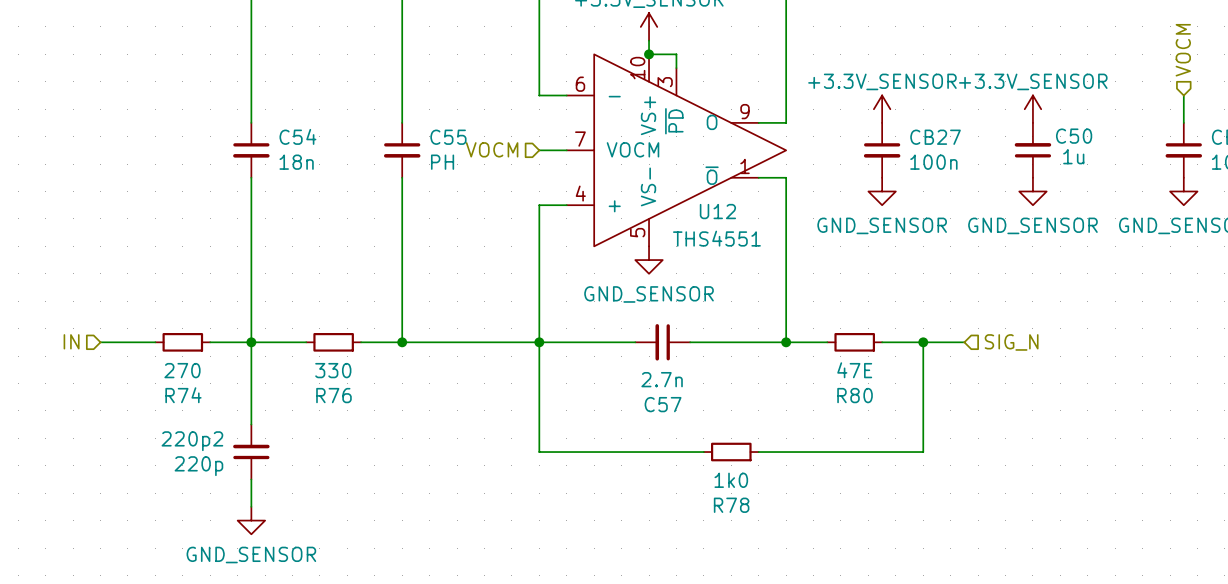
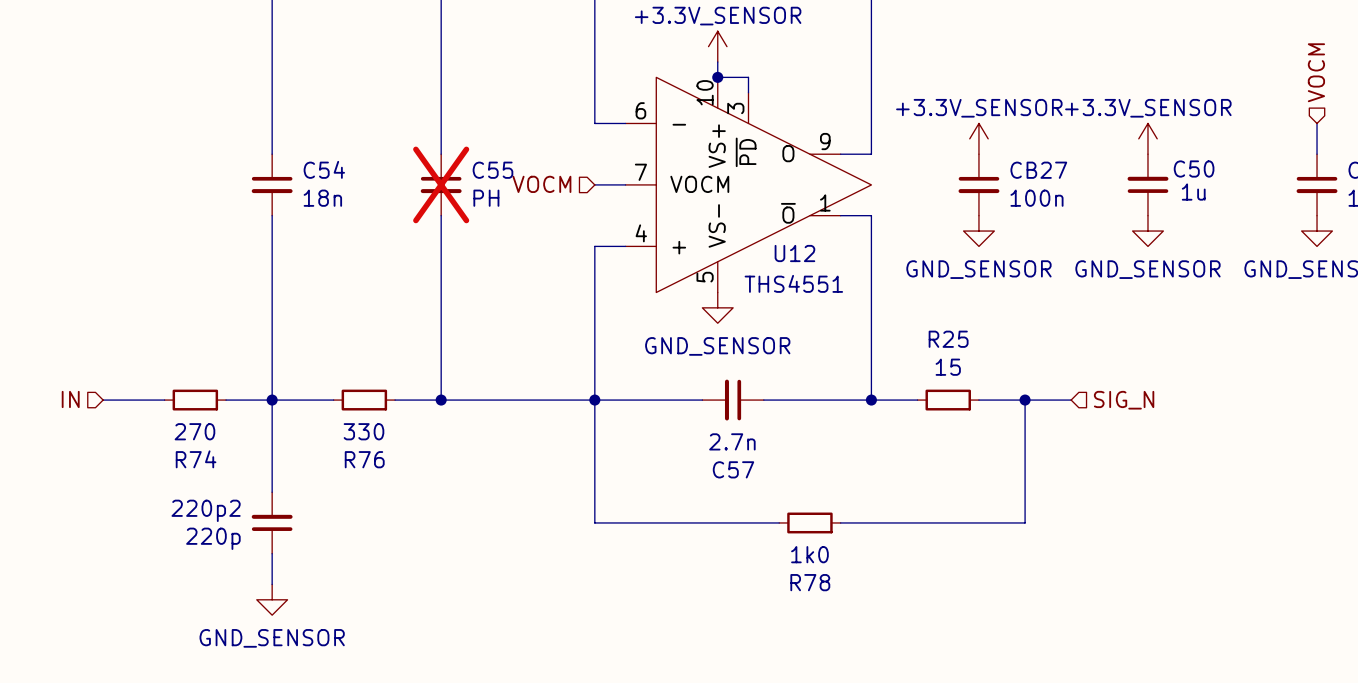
C55 do-not-place cross: none -> (441, 184)
R80 value: 47E (854, 370) -> 15 (948, 367)
R80 name: R80 (855, 395) -> R25 (948, 339)

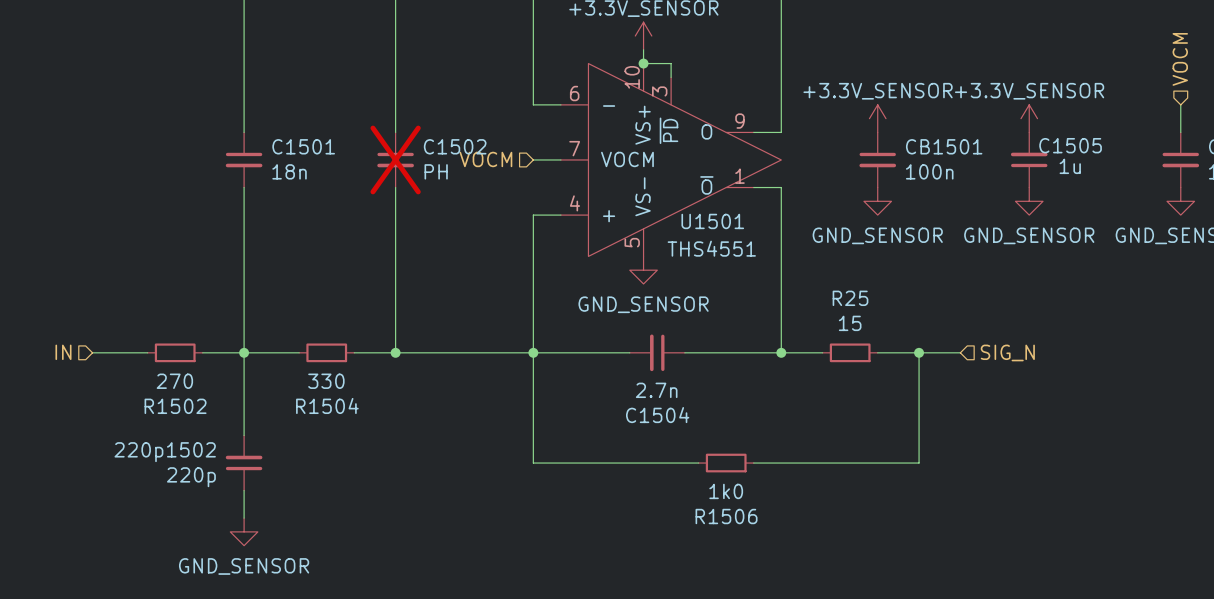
C54 name: C54 (324, 169) -> C1501 (303, 146)
C50 name: C50 (1194, 169) -> C1505 (1070, 145)
C55 name: C55 (492, 170) -> C1502 (455, 146)
CB27 name: CB27 (1038, 170) -> CB1501 (944, 146)
U12 name: U12 (794, 253) -> U1501 (712, 221)
R74 name: R74 (196, 459) -> R1502 (175, 406)
R76 name: R76 (364, 459) -> R1504 (327, 405)
C57 name: C57 (733, 469) -> C1504 (657, 415)
220p2 name: 220p2 (206, 510) -> 220p1502 (165, 452)
R78 name: R78 (810, 582) -> R1506 (726, 516)

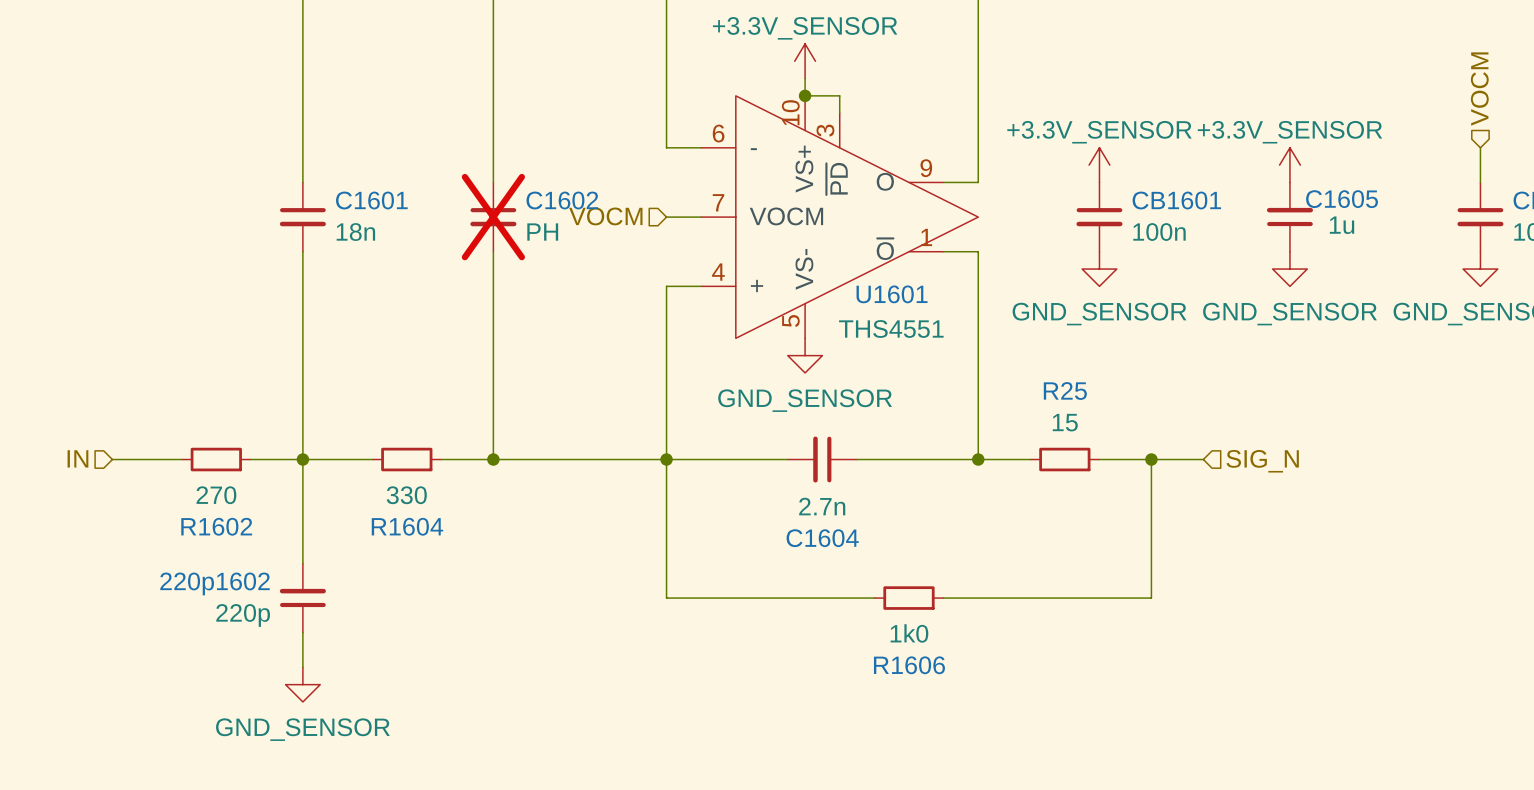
C1505 name: C1505 (1070, 145) -> C1605 (1342, 199)
C1501 name: C1501 (303, 146) -> C1601 (371, 200)
C1502 name: C1502 (455, 146) -> C1602 (562, 200)
CB1501 name: CB1501 (944, 146) -> CB1601 (1176, 200)
U1501 name: U1501 (712, 221) -> U1601 (892, 294)
R1504 name: R1504 (327, 405) -> R1604 (407, 526)
R1502 name: R1502 (175, 406) -> R1602 (216, 526)
C1504 name: C1504 (657, 415) -> C1604 (822, 538)
220p1502 name: 220p1502 (165, 452) -> 220p1602 (215, 583)
R1506 name: R1506 (726, 516) -> R1606 (909, 665)

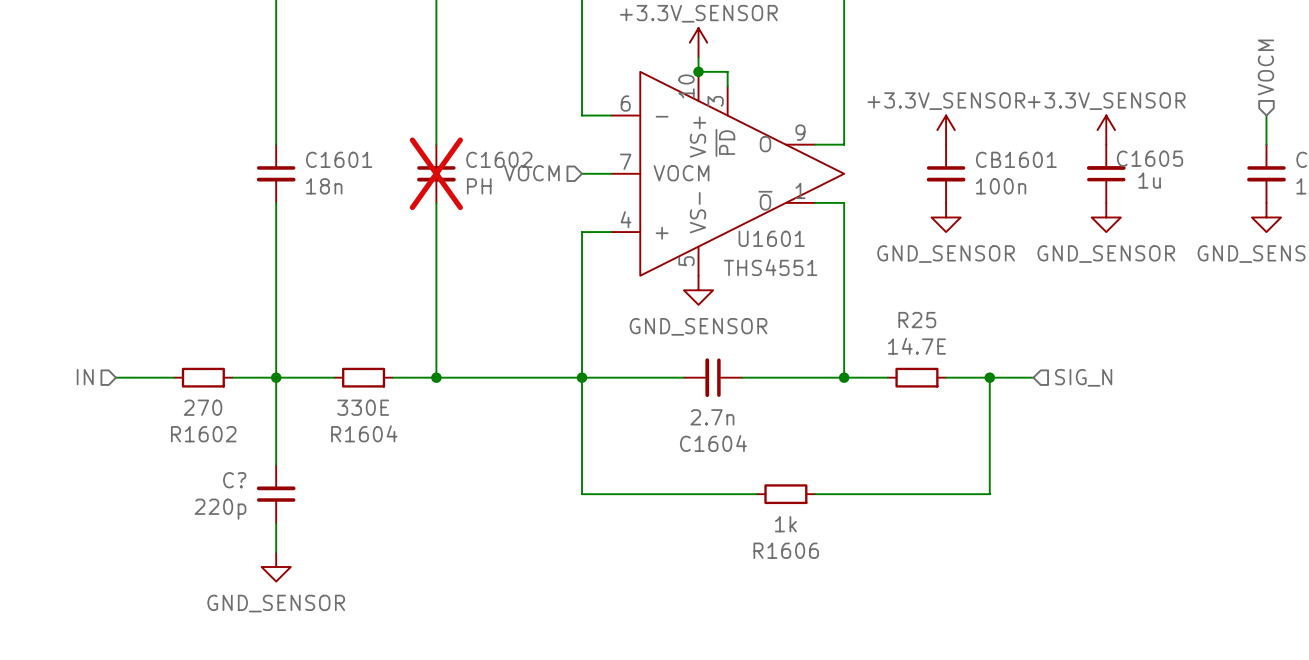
R25 value: 15 (1065, 422) -> 14.7E (916, 346)
R1604 value: 330 (406, 495) -> 330E (363, 407)
220p1602 name: 220p1602 (215, 583) -> C? (234, 480)
R1606 value: 1k0 (909, 633) -> 1k (785, 524)

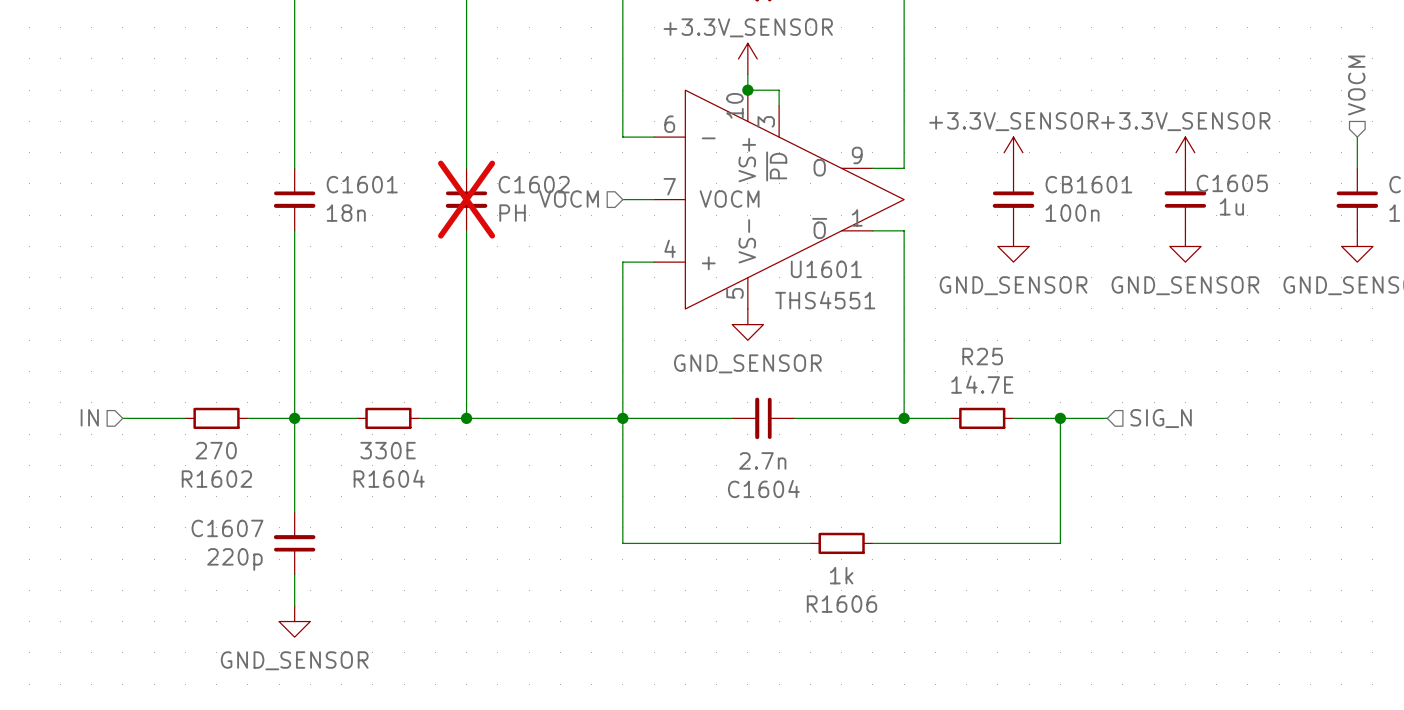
C? name: C? (234, 480) -> C1607 (227, 528)

